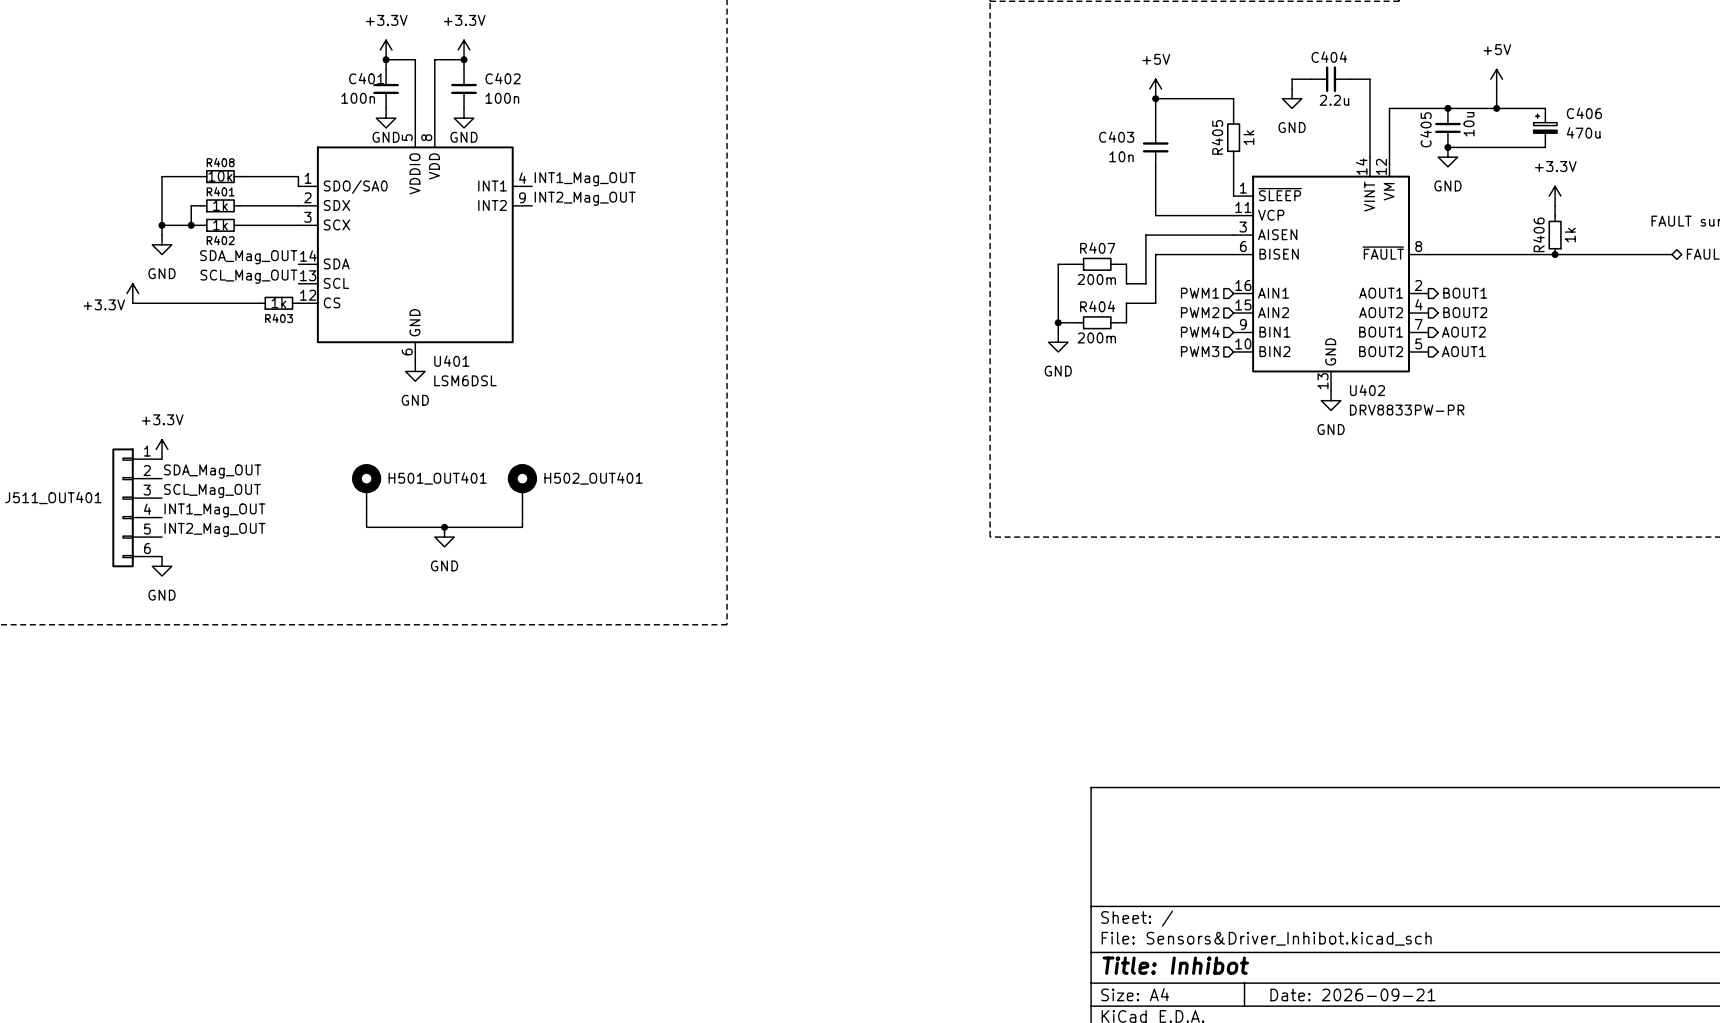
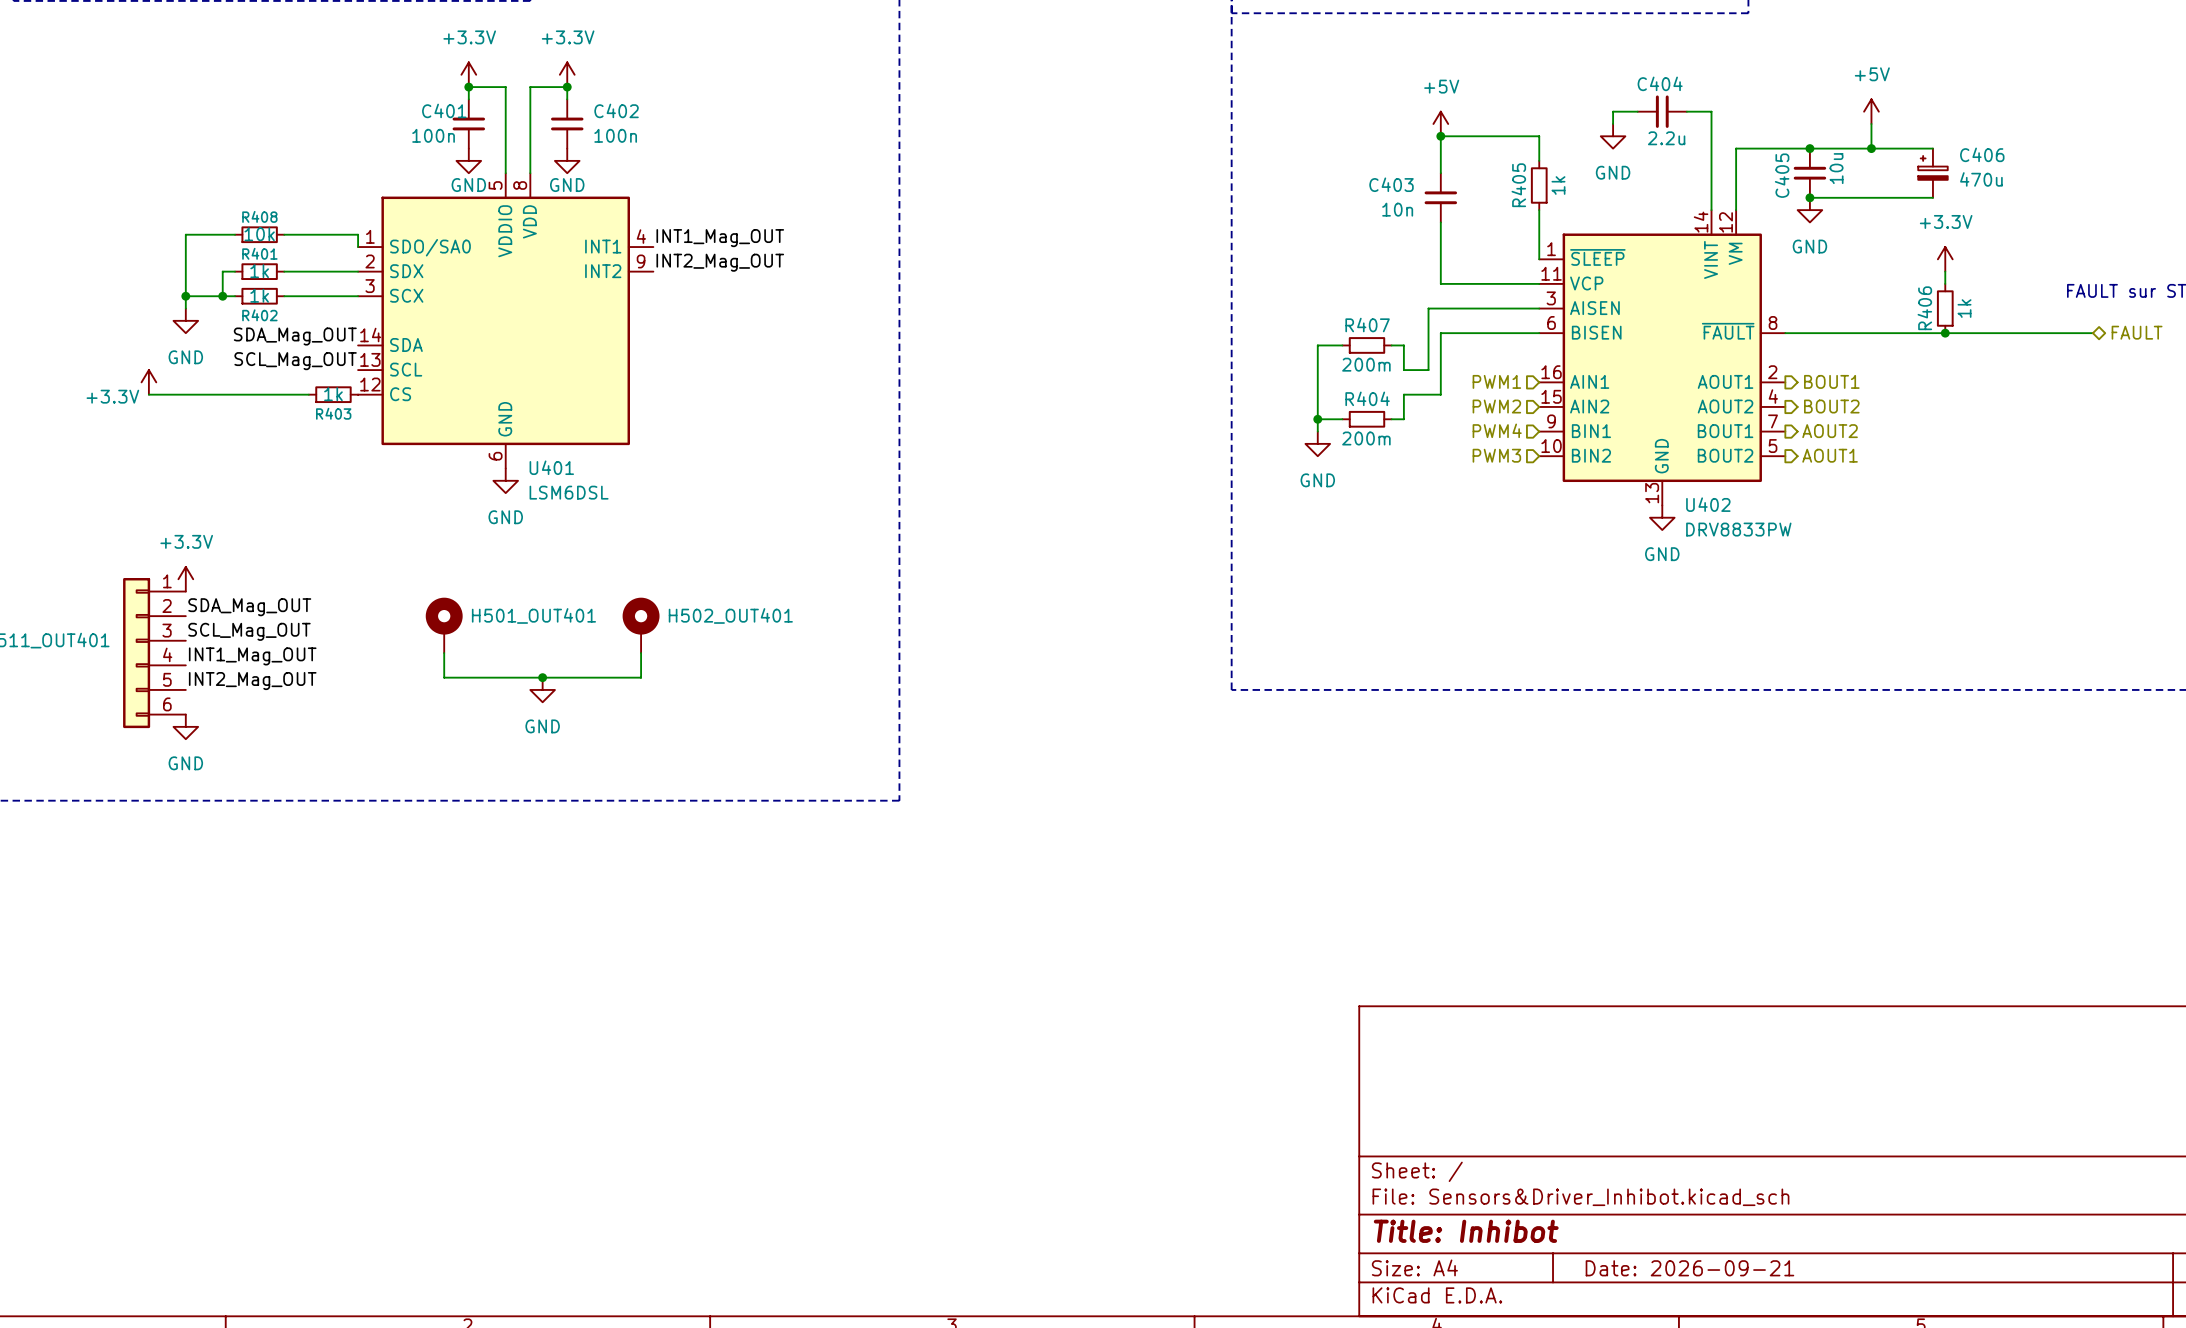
U402 value: DRV8833PW-PR (1407, 410) -> DRV8833PW (1738, 529)

